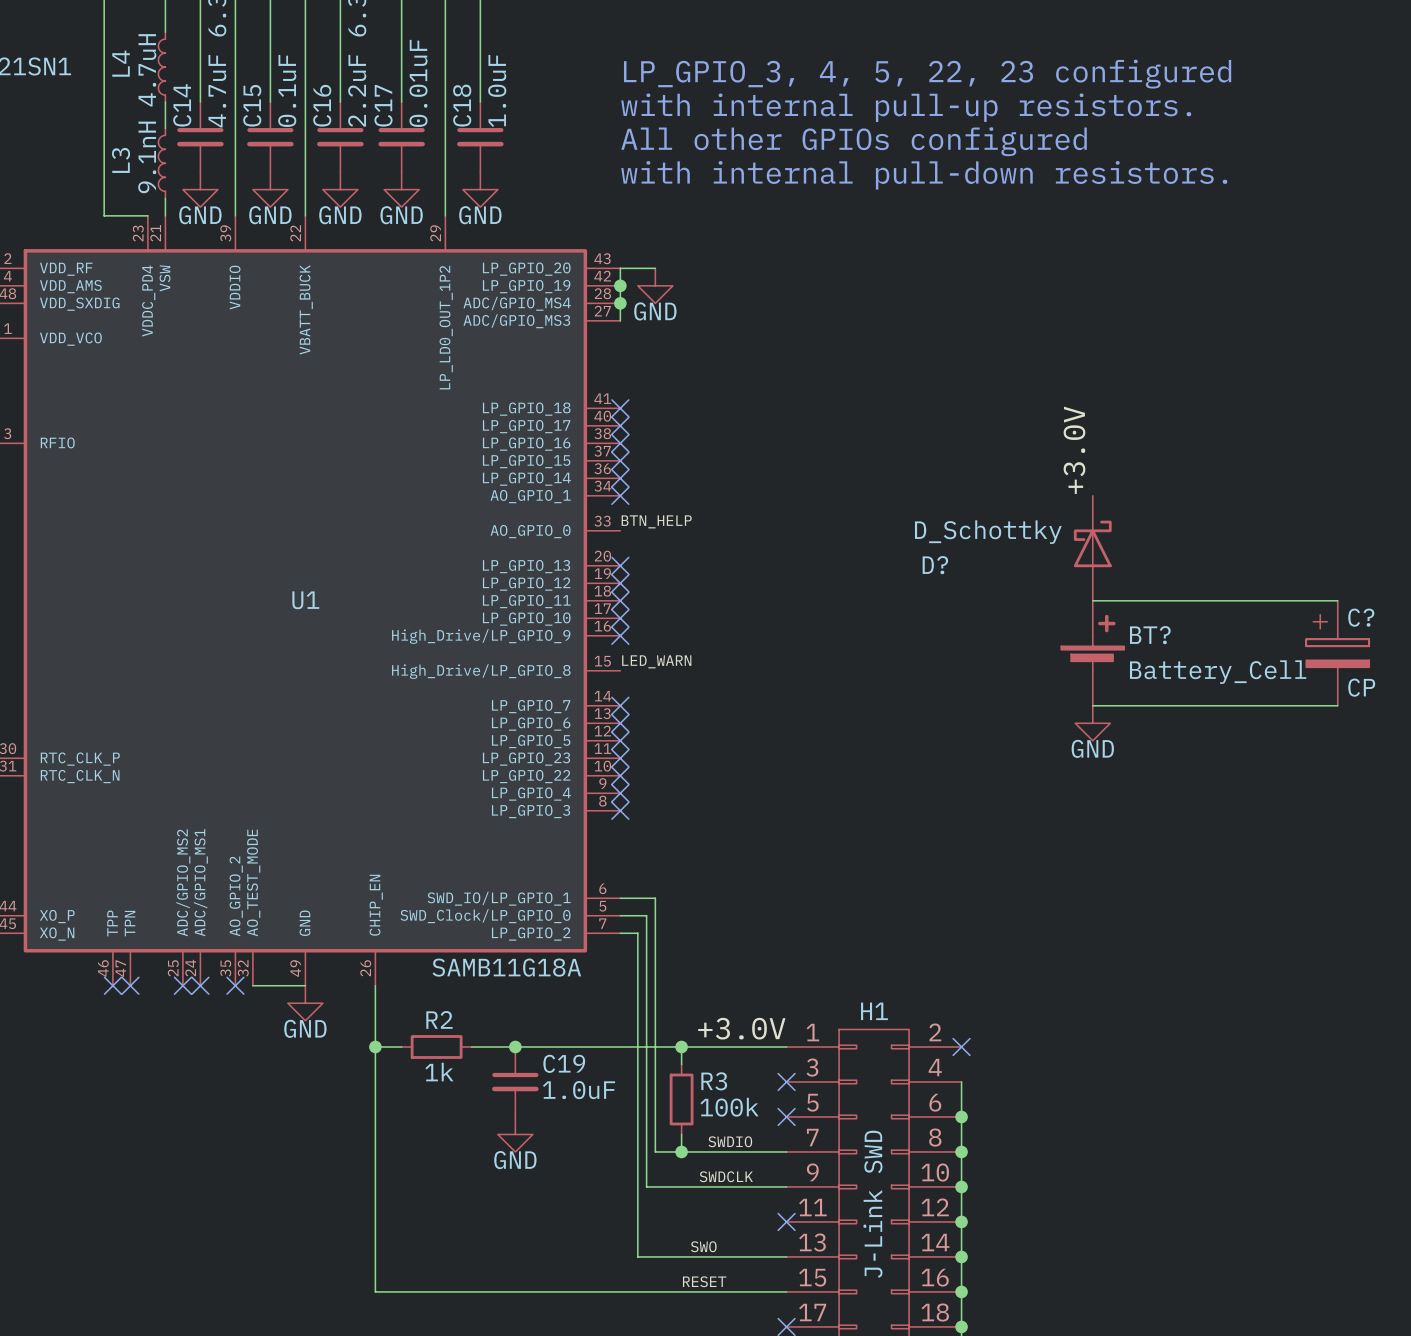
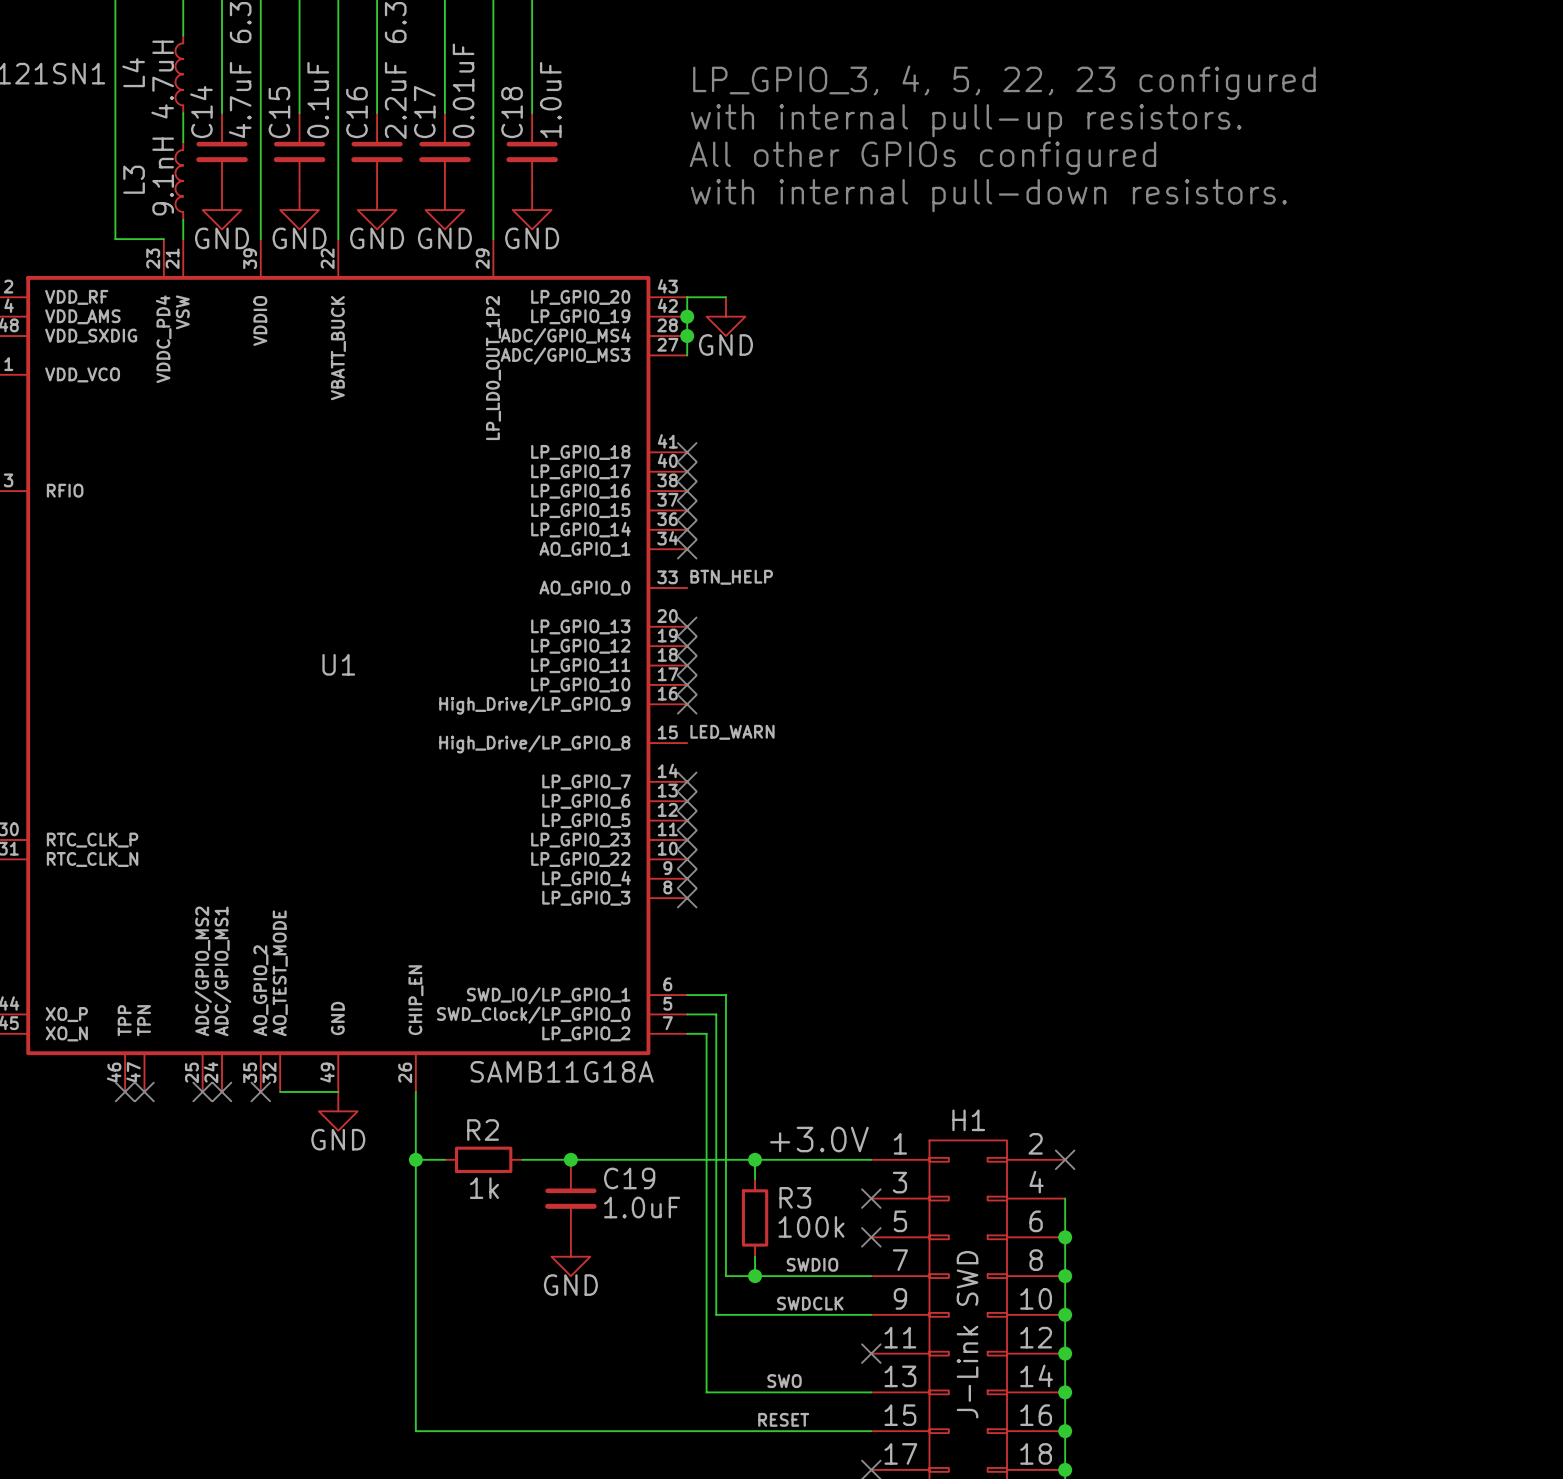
label: +3.0V (1074, 450) -> none
D?: D_Schottky (1092, 548) -> none
wire: (1092, 600) (1337, 600) -> none
BT?: Battery_Cell (1092, 653) -> none
C?: CP (1337, 653) -> none
wire: (1092, 705) (1337, 705) -> none
power symbol: GND (1092, 723) -> none

